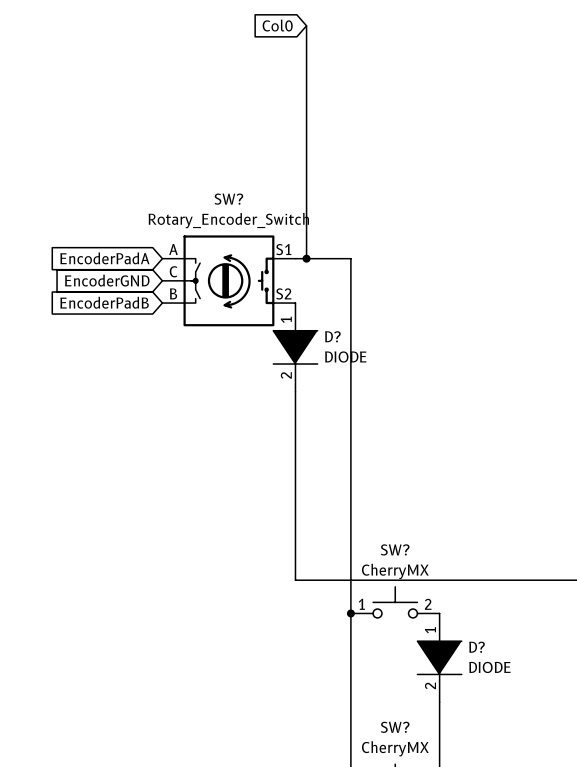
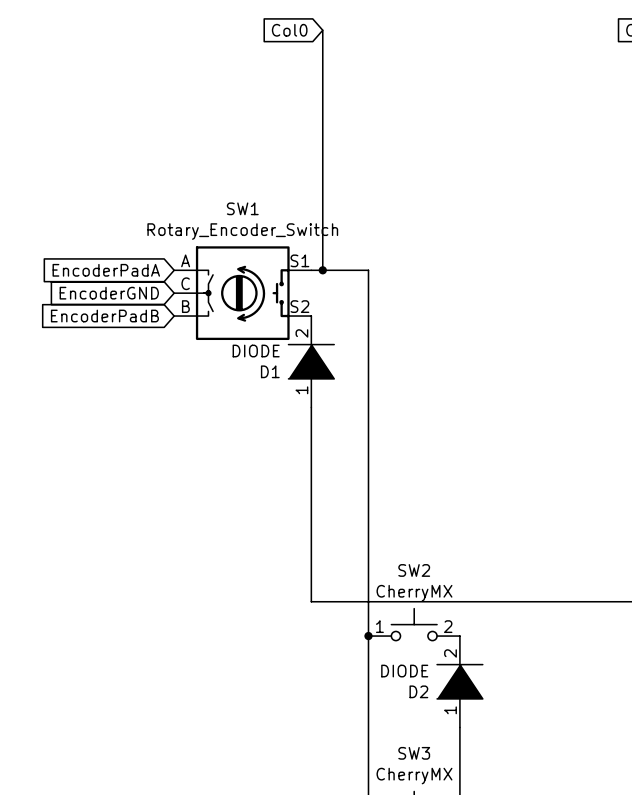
SW? name: SW? (228, 199) -> SW1 (242, 208)
D?: DIODE (295, 347) -> none
D1: none -> DIODE (311, 361)
SW? name: SW? (395, 549) -> SW2 (414, 570)
D?: DIODE (439, 657) -> none
D2: none -> DIODE (459, 681)
SW? name: SW? (395, 727) -> SW3 (414, 753)

